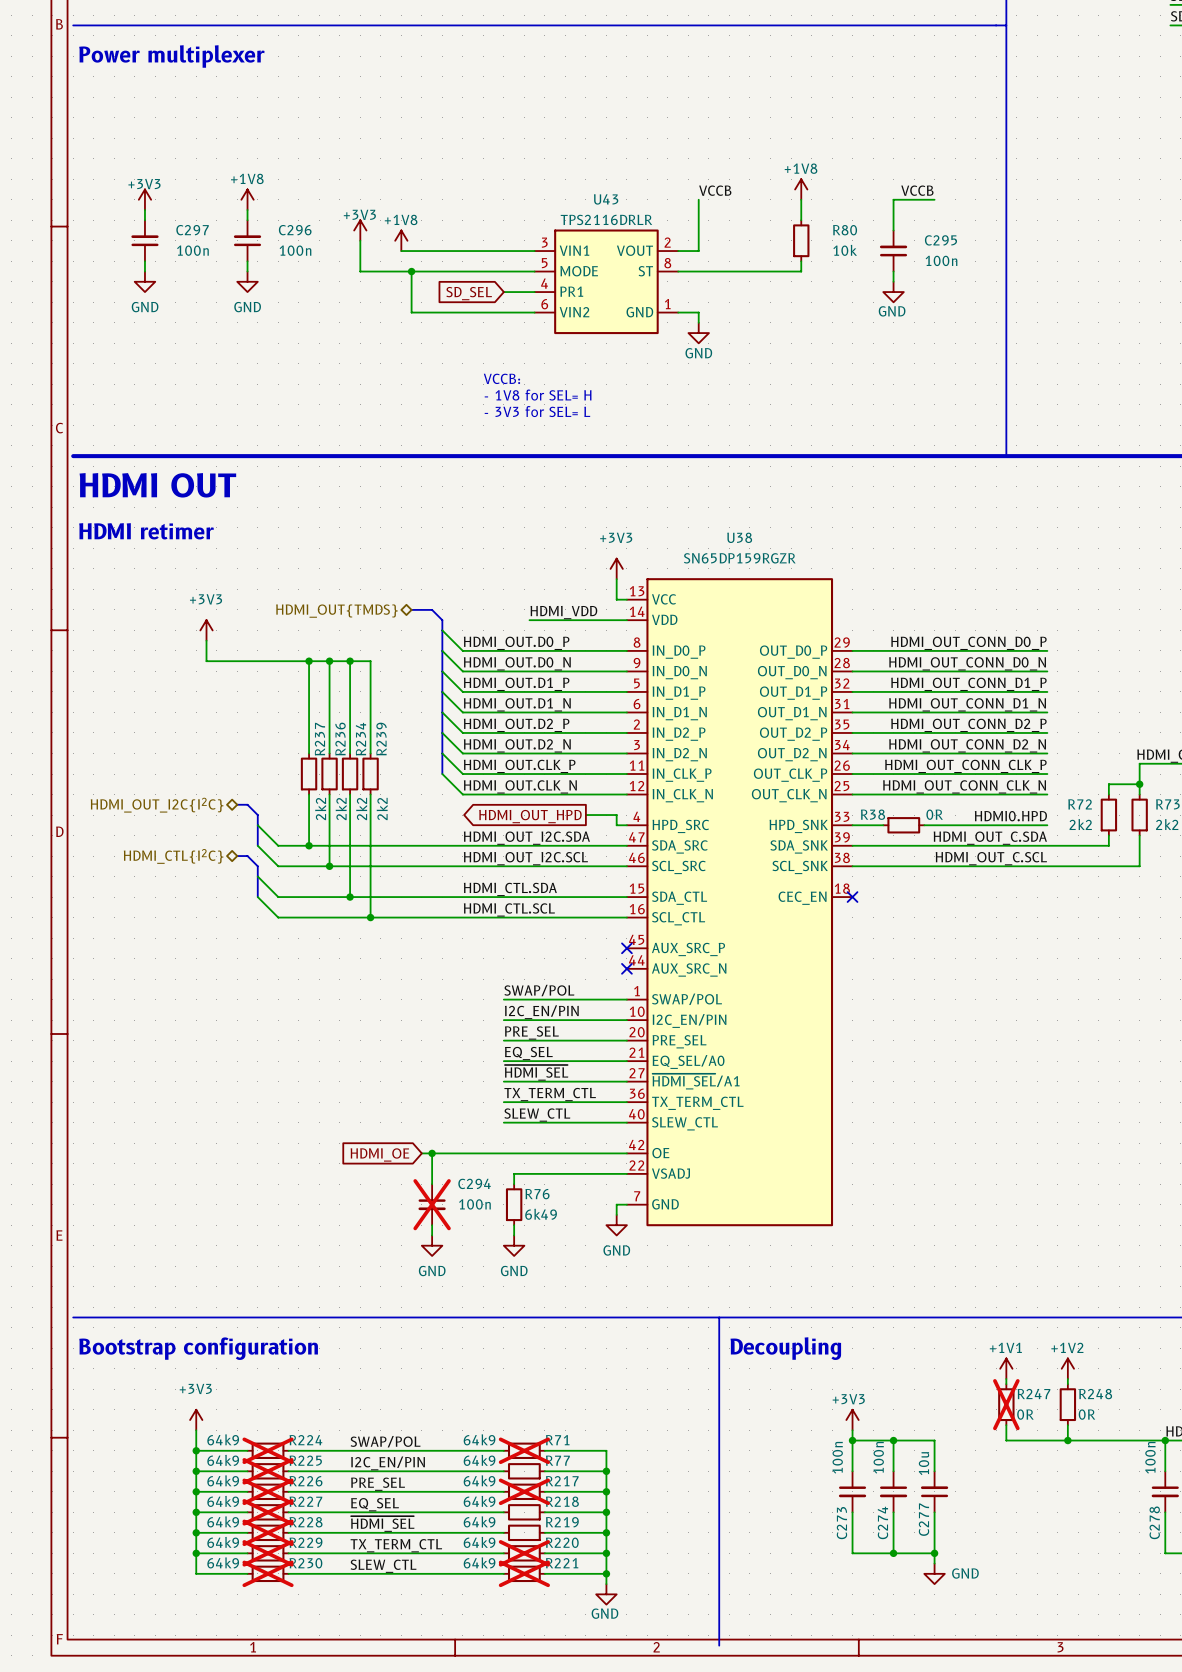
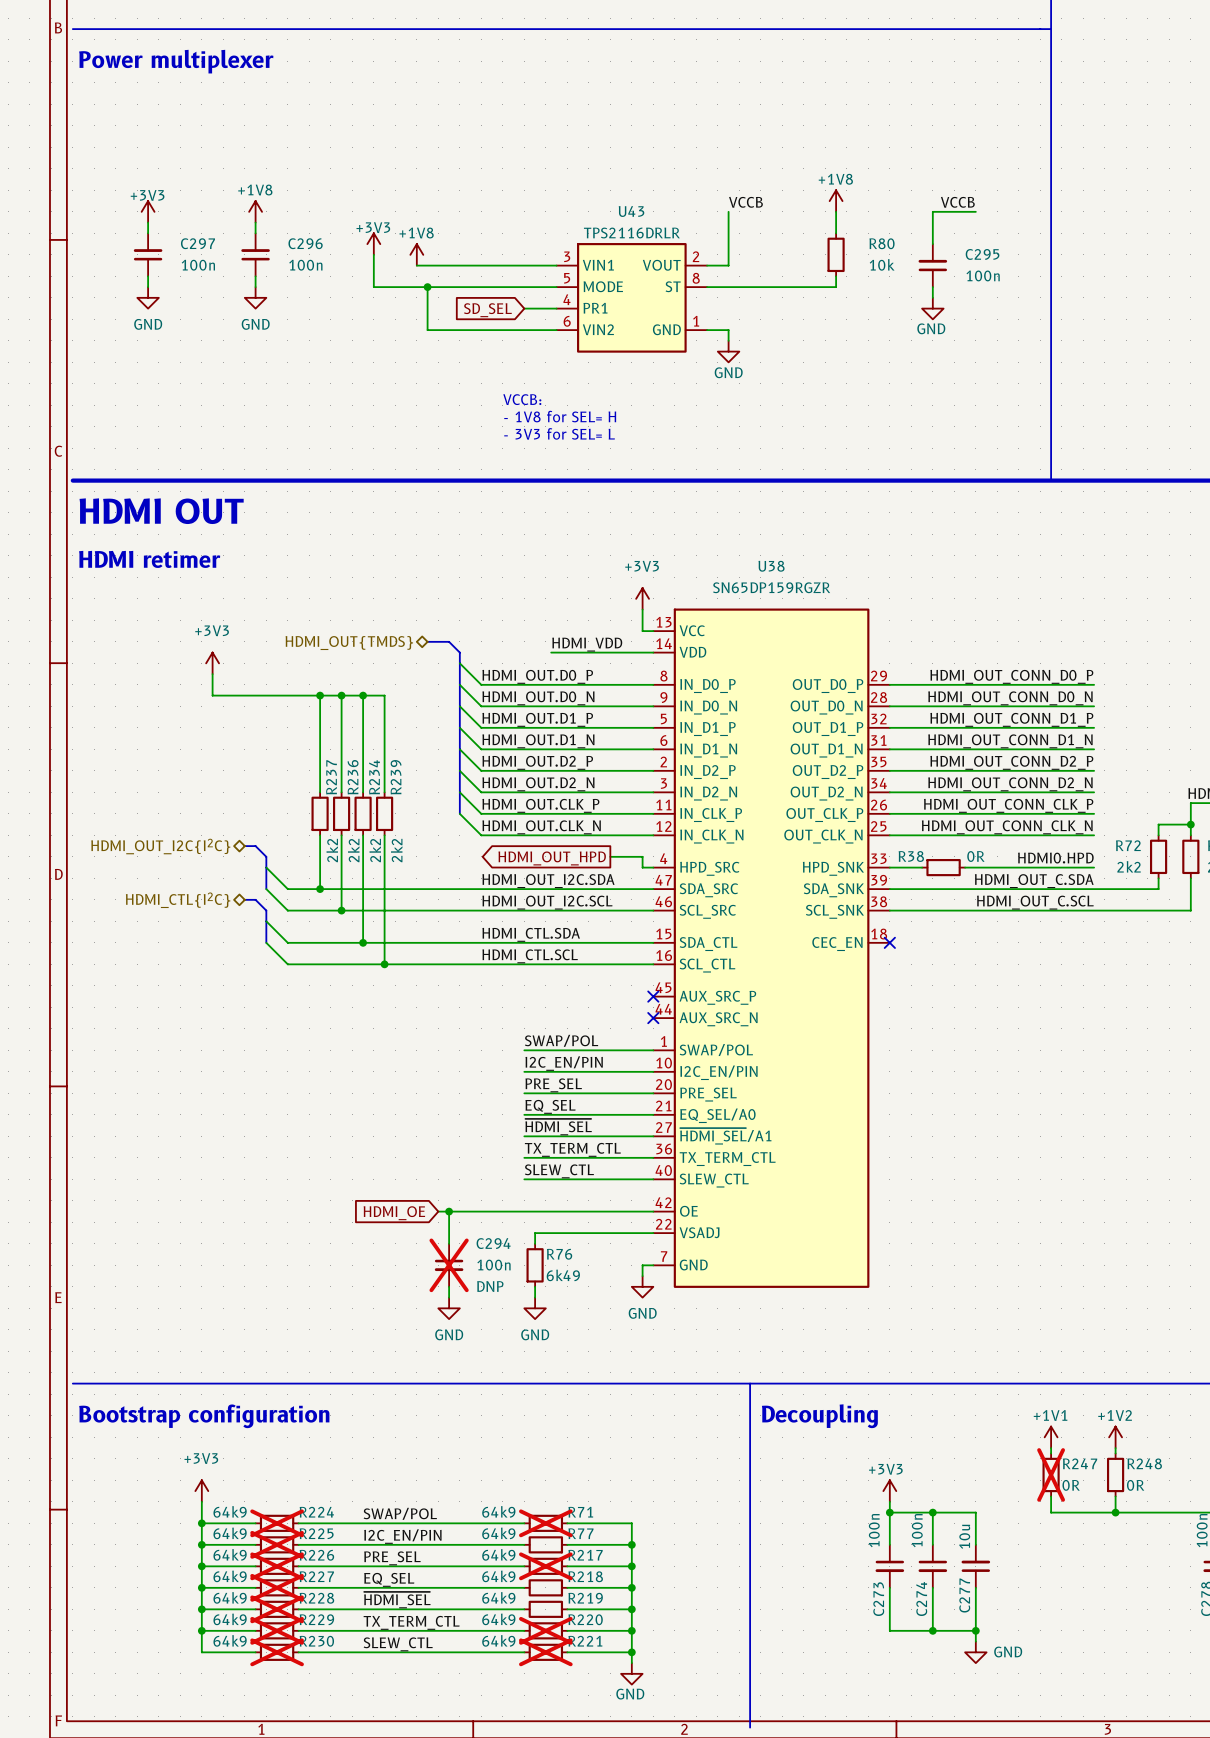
C294 text: none -> DNP (490, 1286)

